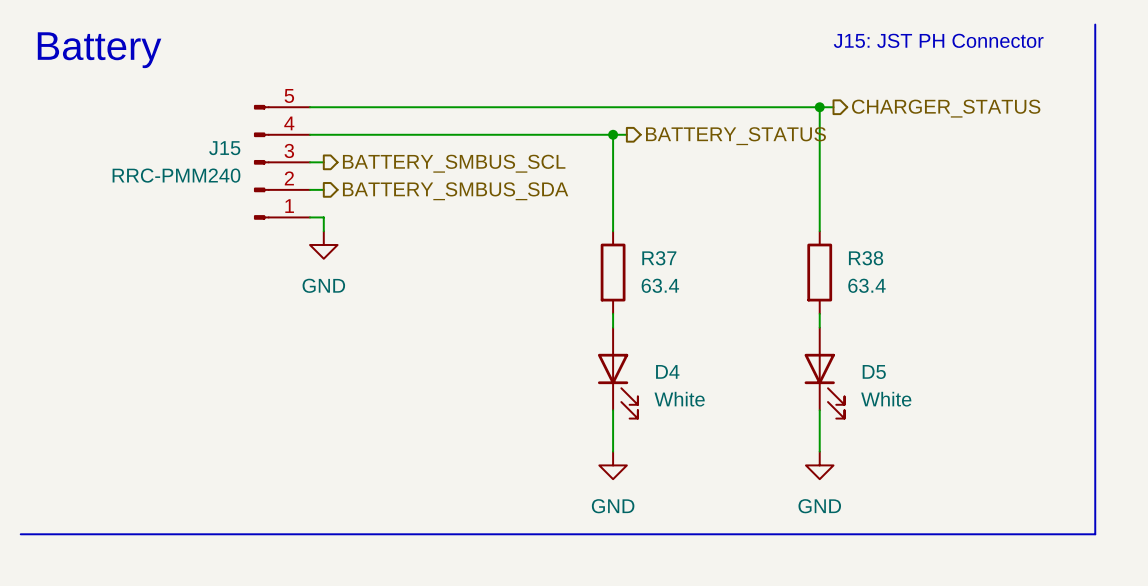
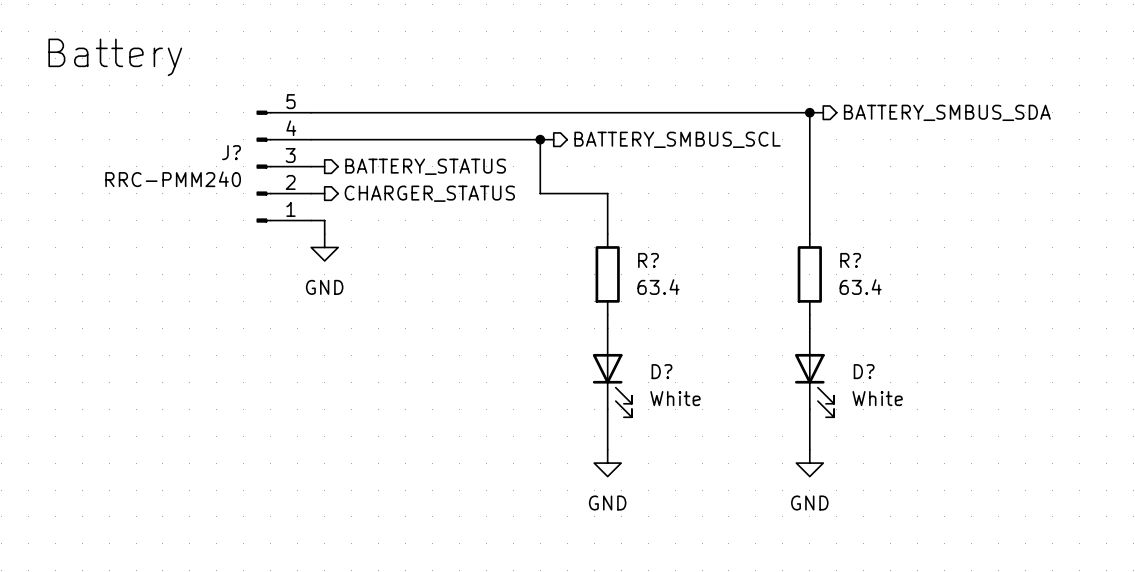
line: (1095, 24) (1095, 534) (20, 534) -> none
text: J15: JST PH Connector (938, 40) -> none
hierarchical label: CHARGER_STATUS (946, 108) -> BATTERY_SMBUS_SDA (947, 112)
junction: none -> (540, 139)
wire: (557, 134) (626, 134) -> none
wire: (613, 134) (613, 189) -> (540, 139) (540, 193) (607, 193)
junction: (613, 134) -> none
hierarchical label: BATTERY_STATUS (735, 136) -> BATTERY_SMBUS_SCL (677, 139)
J15 name: J15 (224, 148) -> J? (231, 152)
hierarchical label: BATTERY_SMBUS_SCL (454, 163) -> BATTERY_STATUS (425, 166)
hierarchical label: BATTERY_SMBUS_SDA (455, 191) -> CHARGER_STATUS (429, 193)
R37 name: R37 (659, 258) -> R? (648, 260)
R38 name: R38 (866, 258) -> R? (850, 260)
D4 name: D4 (667, 371) -> D? (661, 371)
D5 name: D5 (874, 372) -> D? (864, 371)

